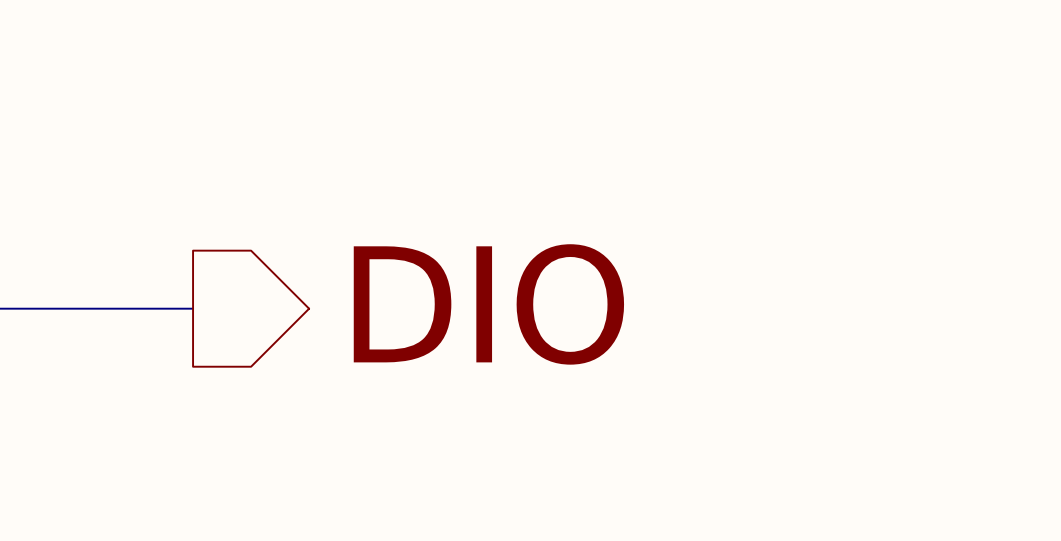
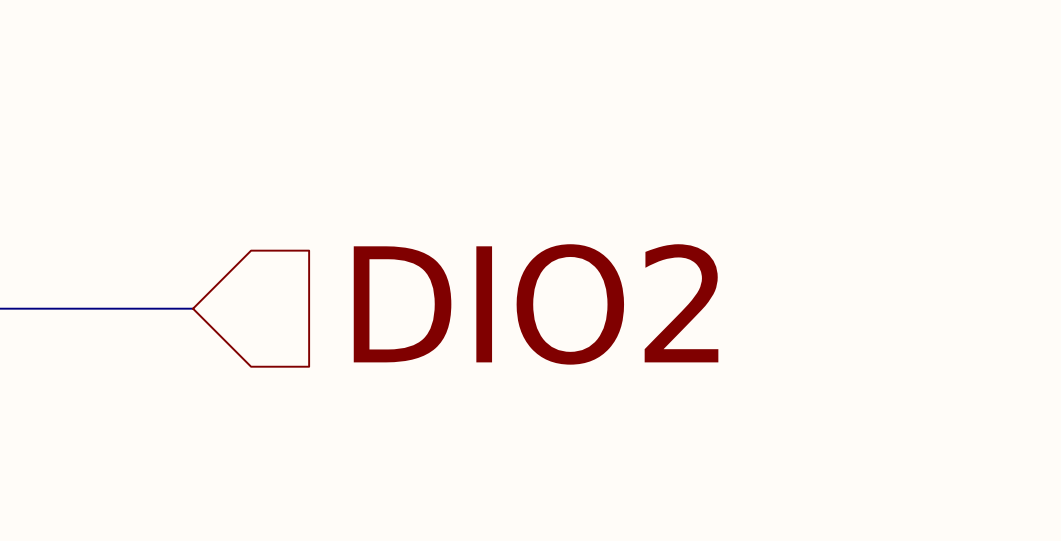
hierarchical label shape: output (488, 304) -> input (536, 304)
hierarchical label: DIO (488, 304) -> DIO2 (536, 304)

